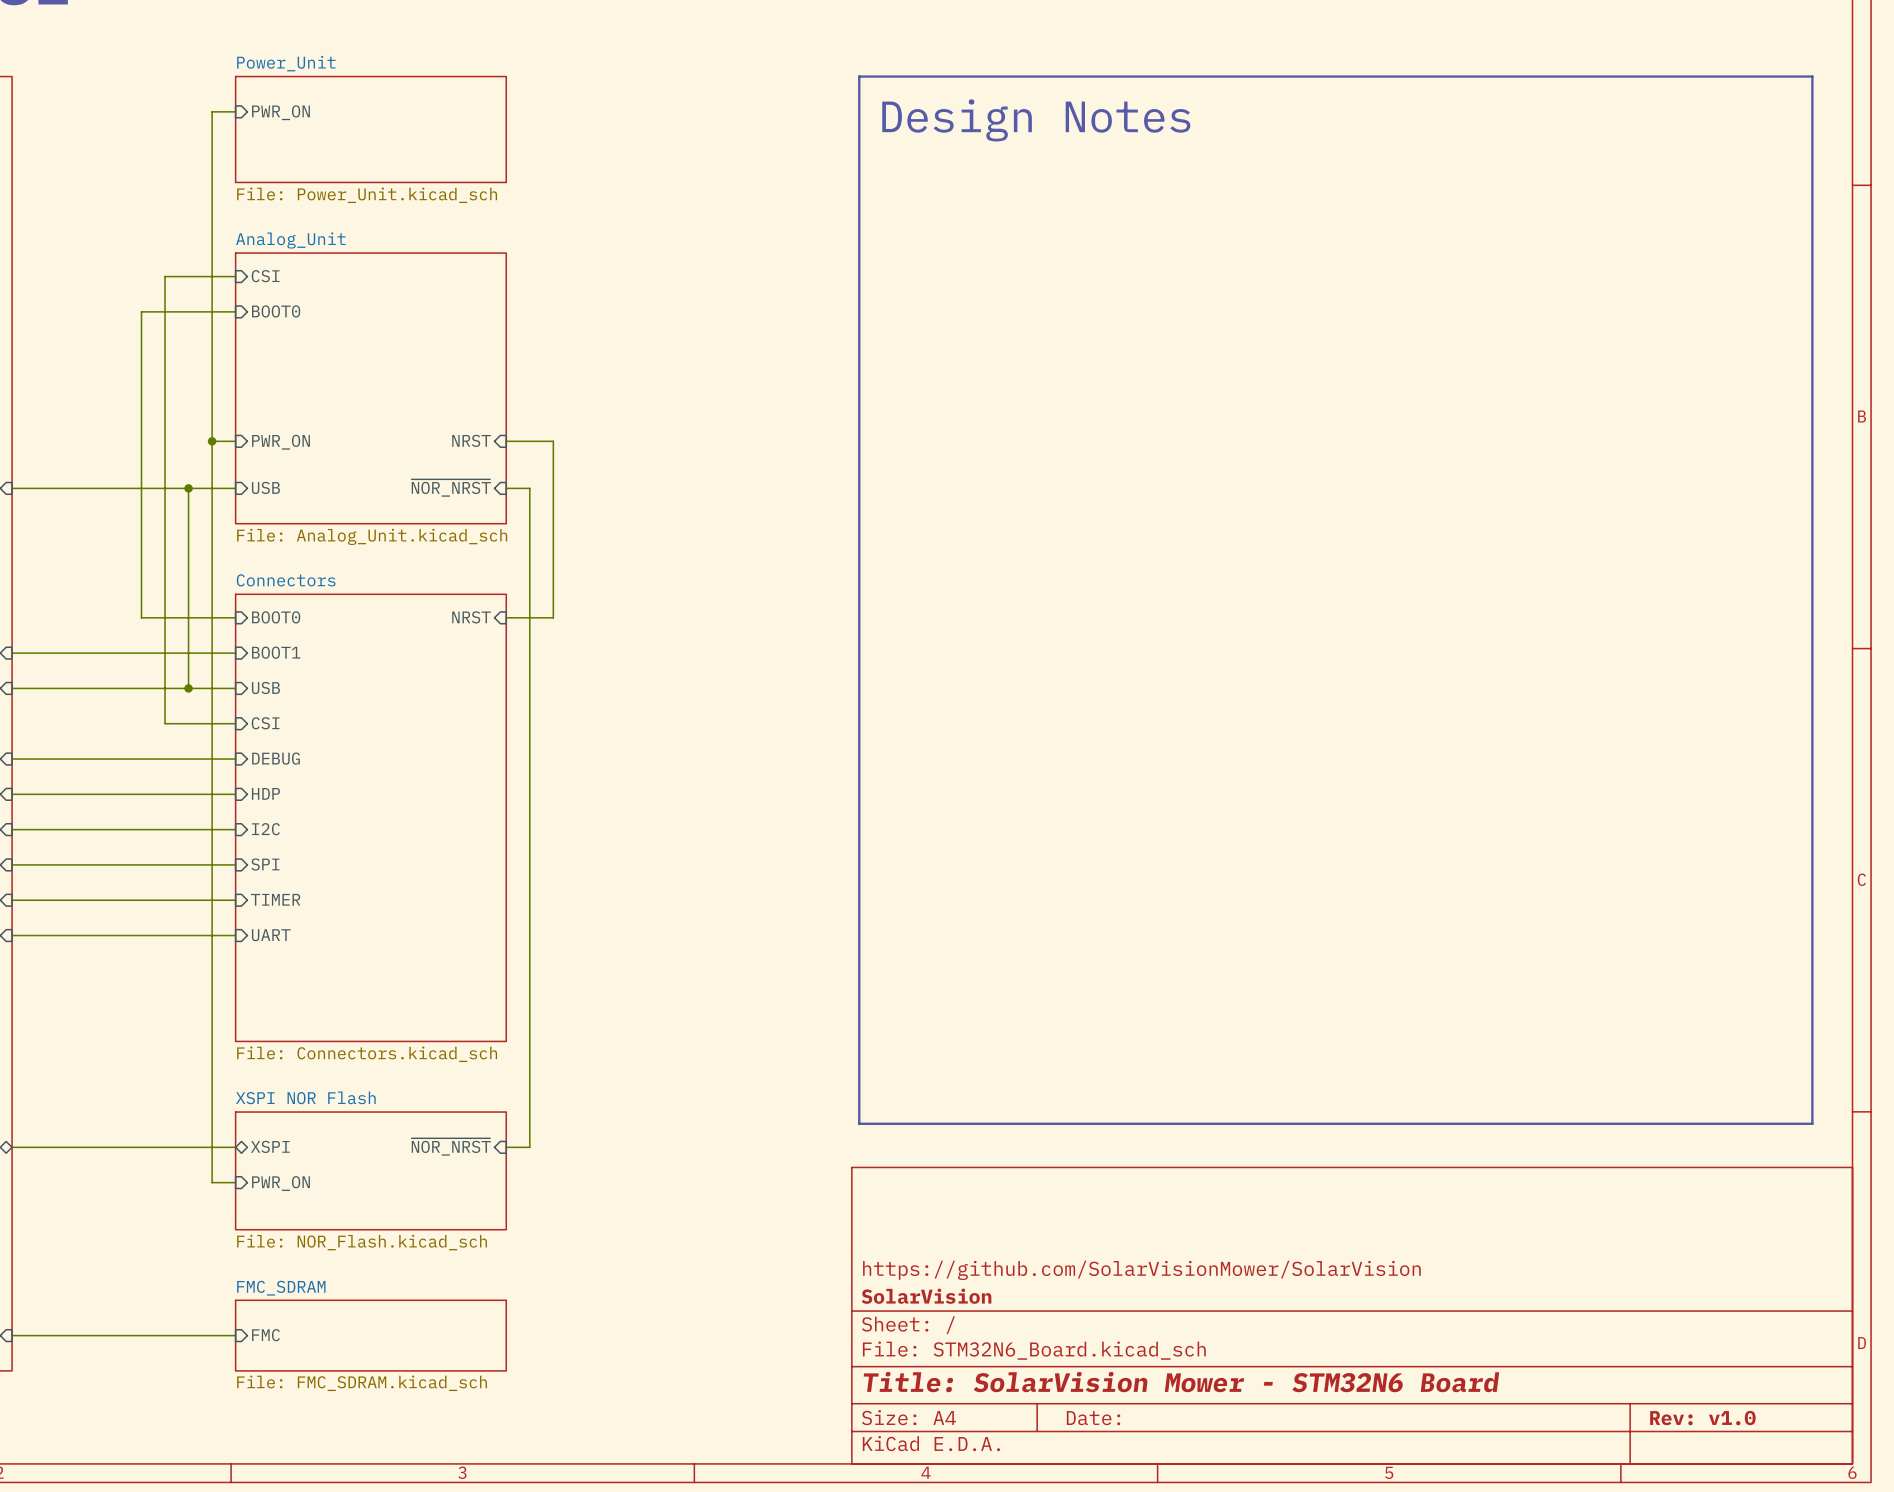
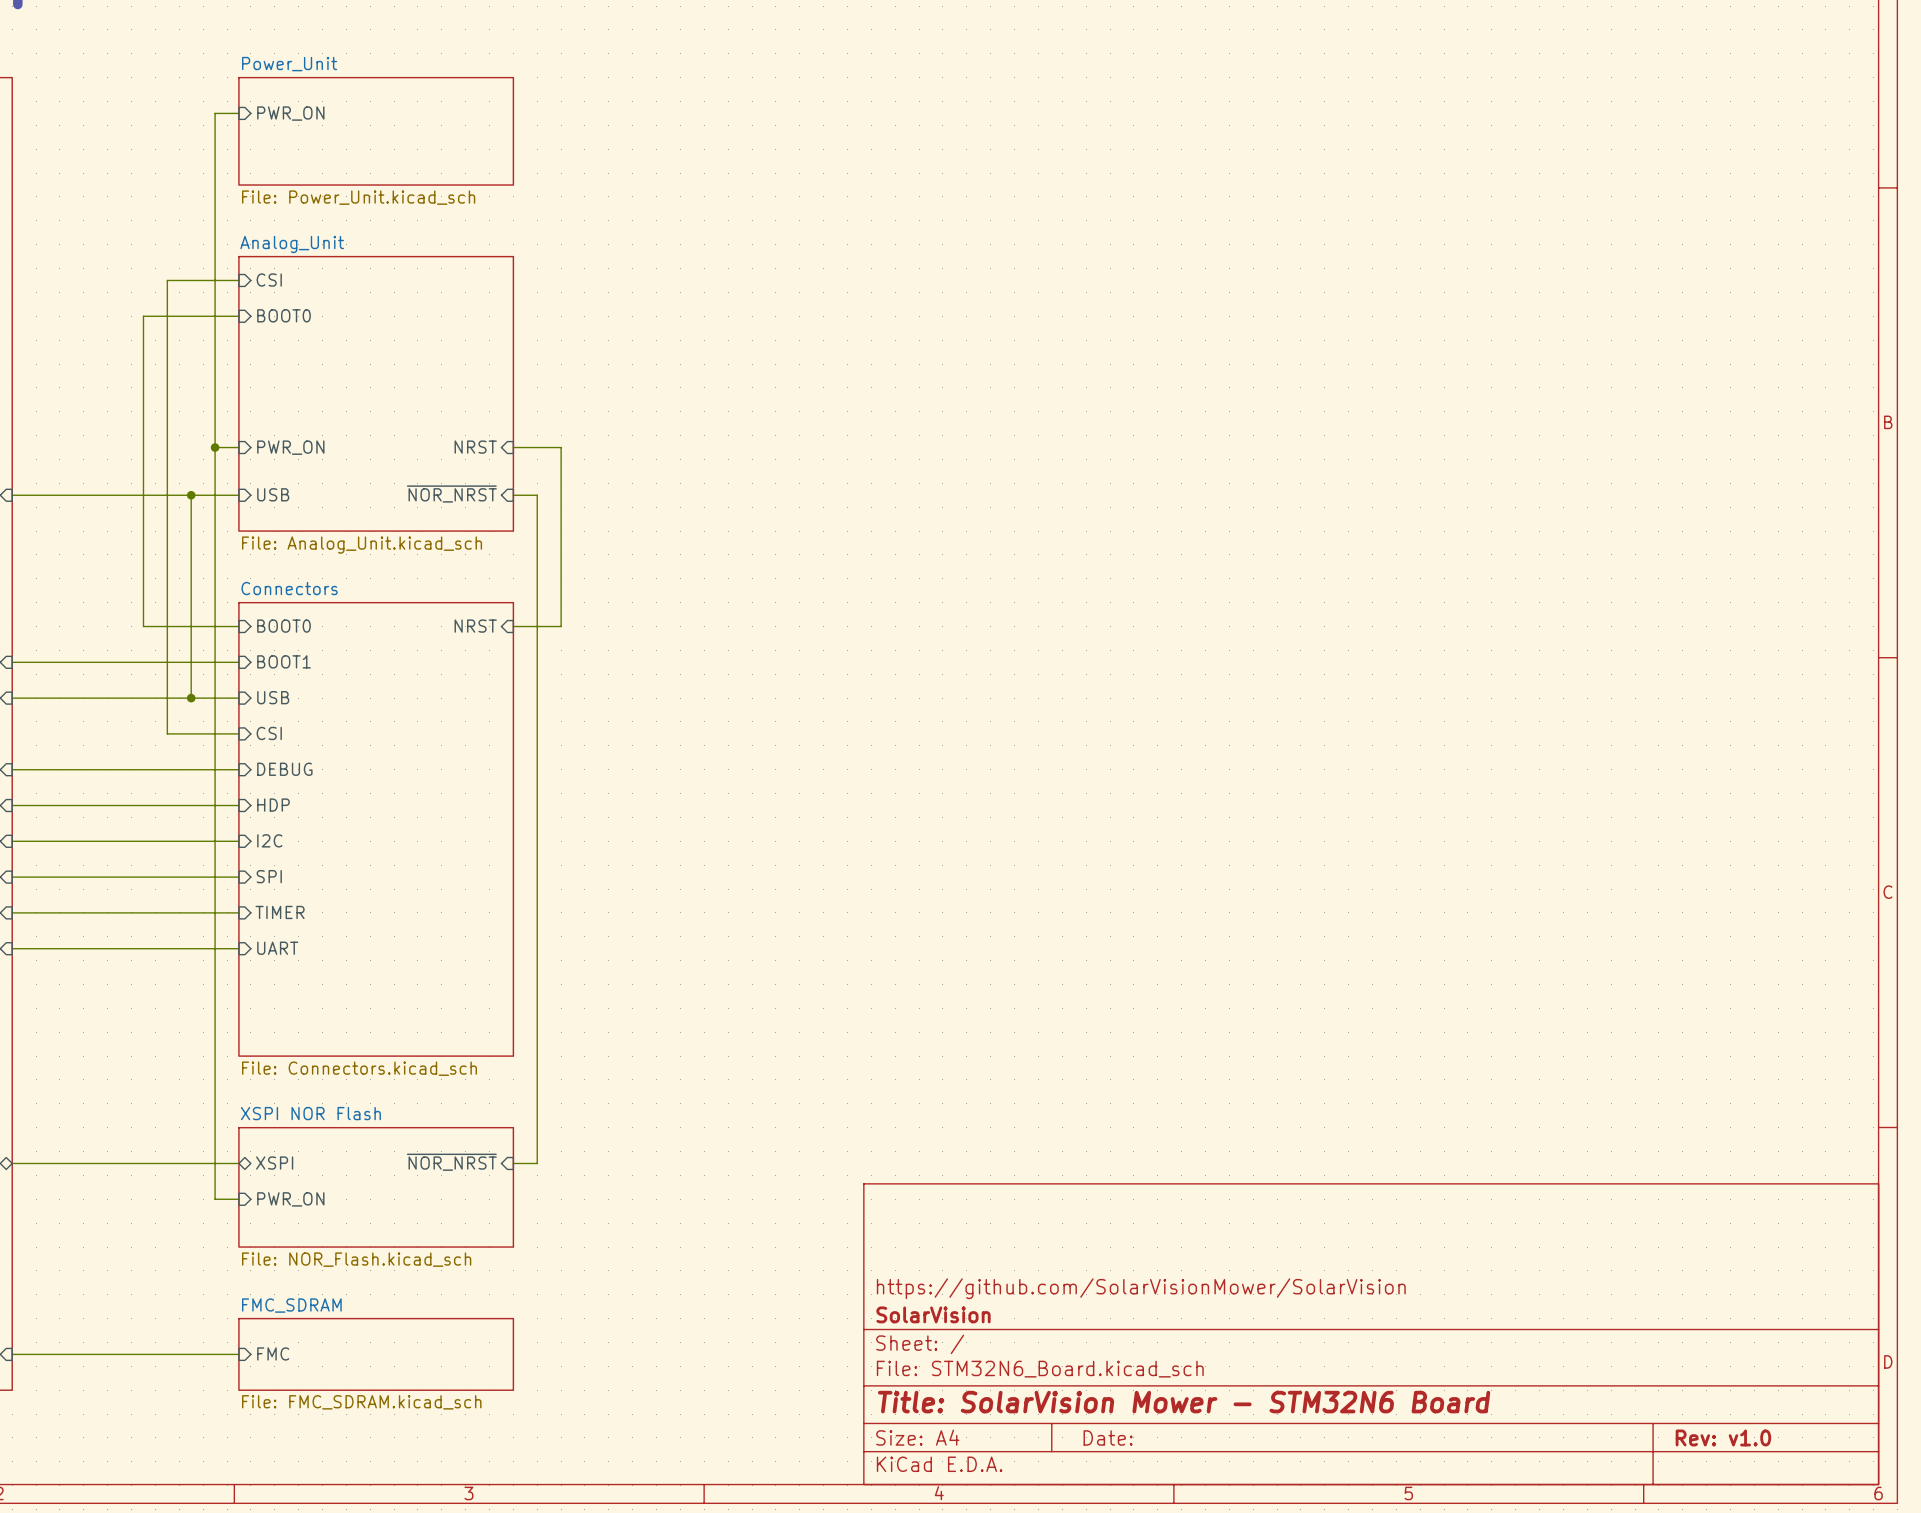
line: (859, 76) (1812, 76) (1812, 1123) (859, 1123) (859, 76) -> none
text: Design Notes (1036, 120) -> none

